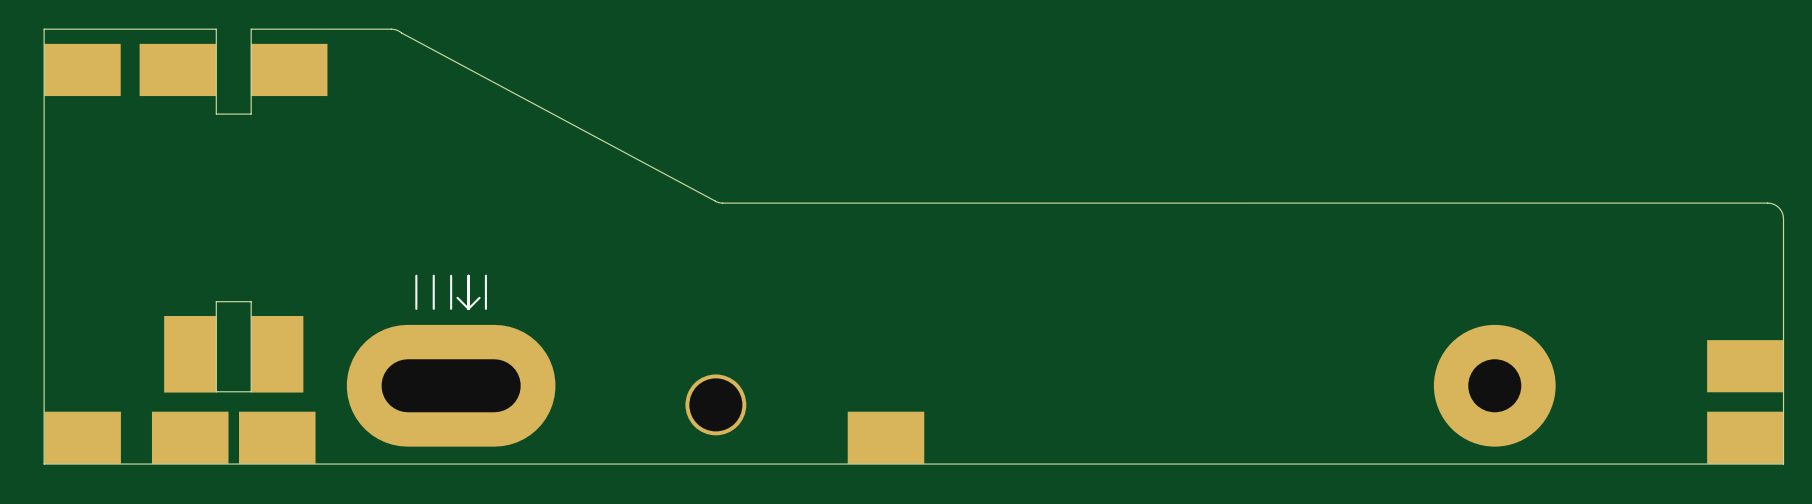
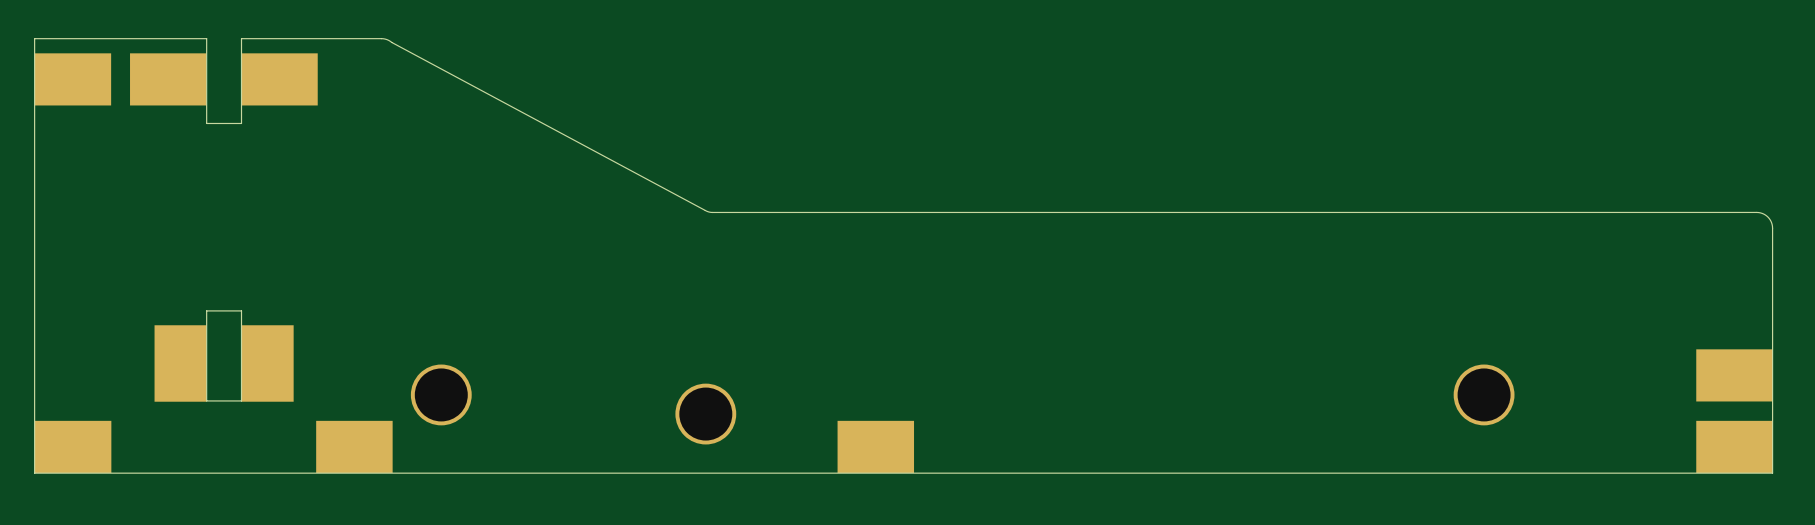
line: (416, 275) (416, 308) -> none
line: (433, 275) (433, 308) -> none
line: (451, 275) (451, 308) -> none
line: (468, 275) (468, 308) -> none
line: (485, 275) (485, 308) -> none
line: (457, 297) (468, 308) -> none
line: (479, 297) (468, 308) -> none
part footprint: [346, 324, 556, 447] -> [410, 364, 472, 426]
part footprint: [1433, 324, 1556, 447] -> [1453, 364, 1515, 426]
part: (190, 437) -> none
part: (277, 437) -> none
part: none -> (354, 446)

